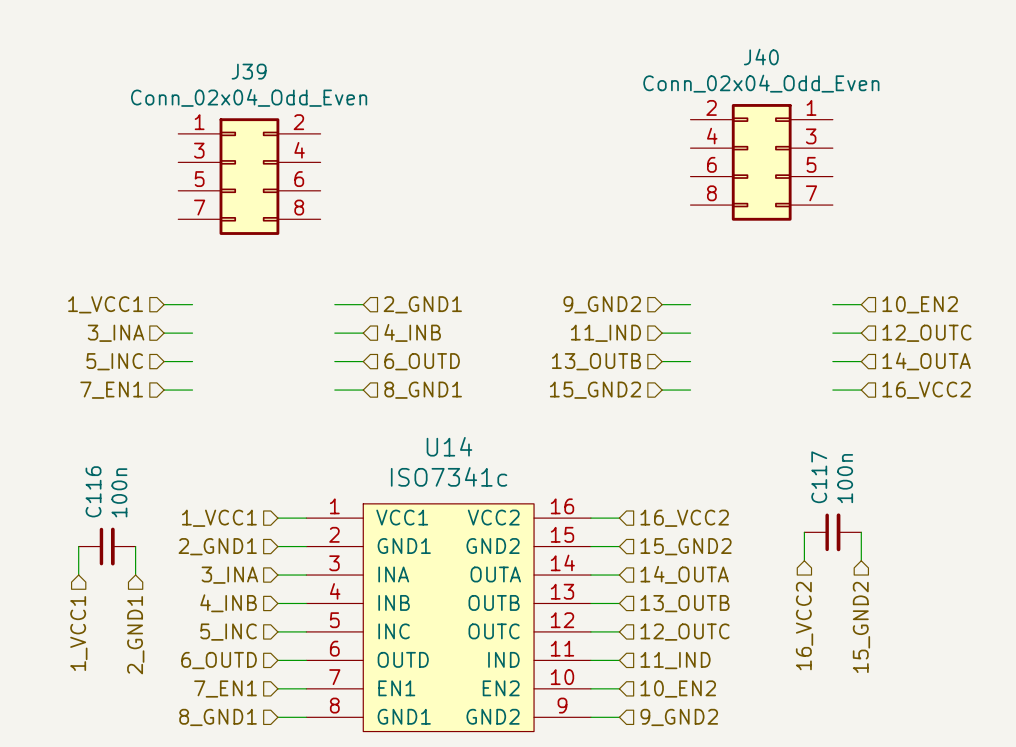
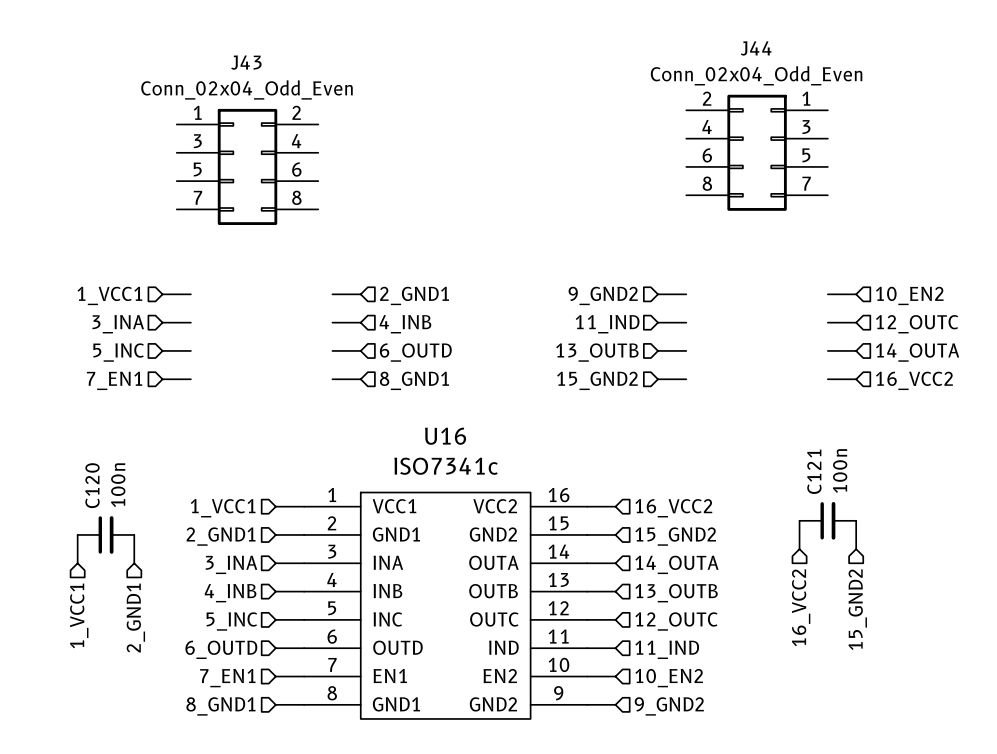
J40 name: J40 (761, 57) -> J44 (756, 48)
J39 name: J39 (249, 71) -> J43 (246, 62)
U14 name: U14 (449, 446) -> U16 (445, 436)
C117 name: C117 (819, 477) -> C121 (814, 471)
C116 name: C116 (93, 491) -> C120 (92, 485)

